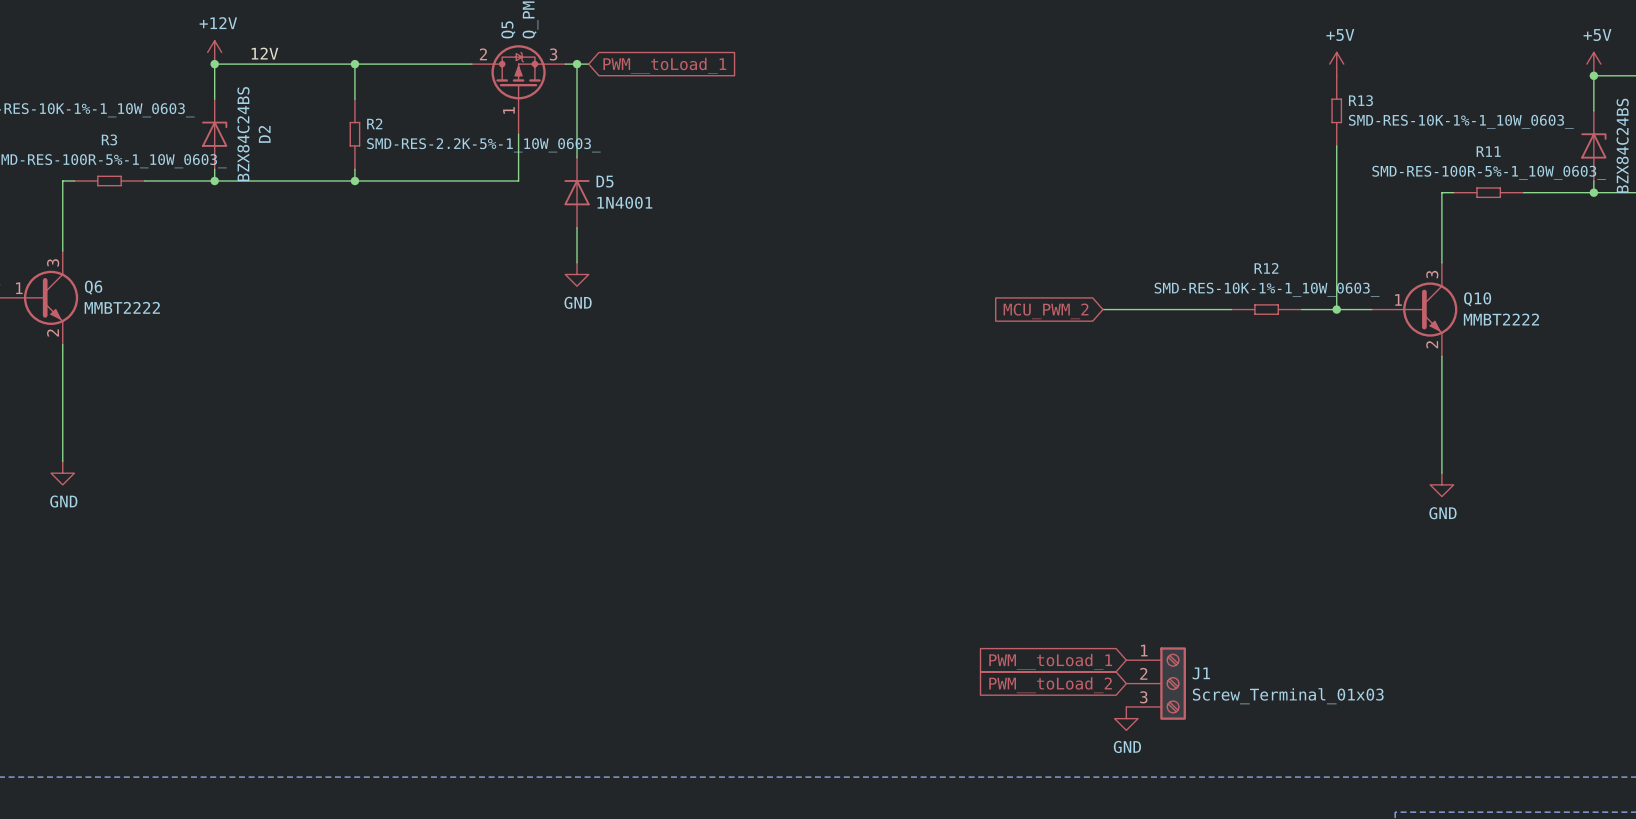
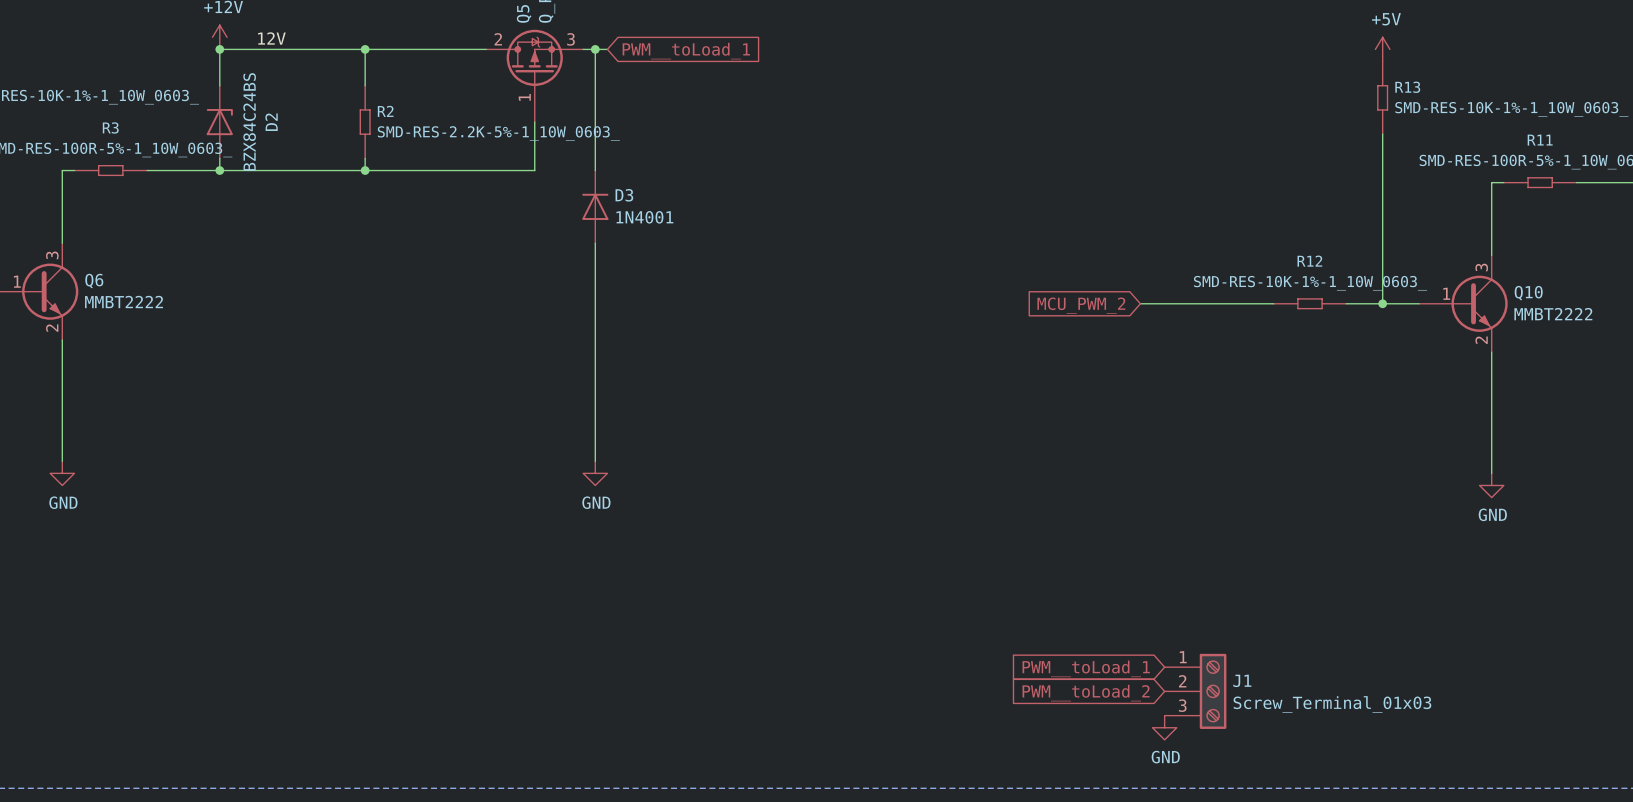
D5: 1N4001 (577, 192) -> none
D3: none -> 1N4001 (595, 206)
wire: none -> (595, 255) (595, 461)
power symbol position: GND (577, 274) -> GND (595, 473)

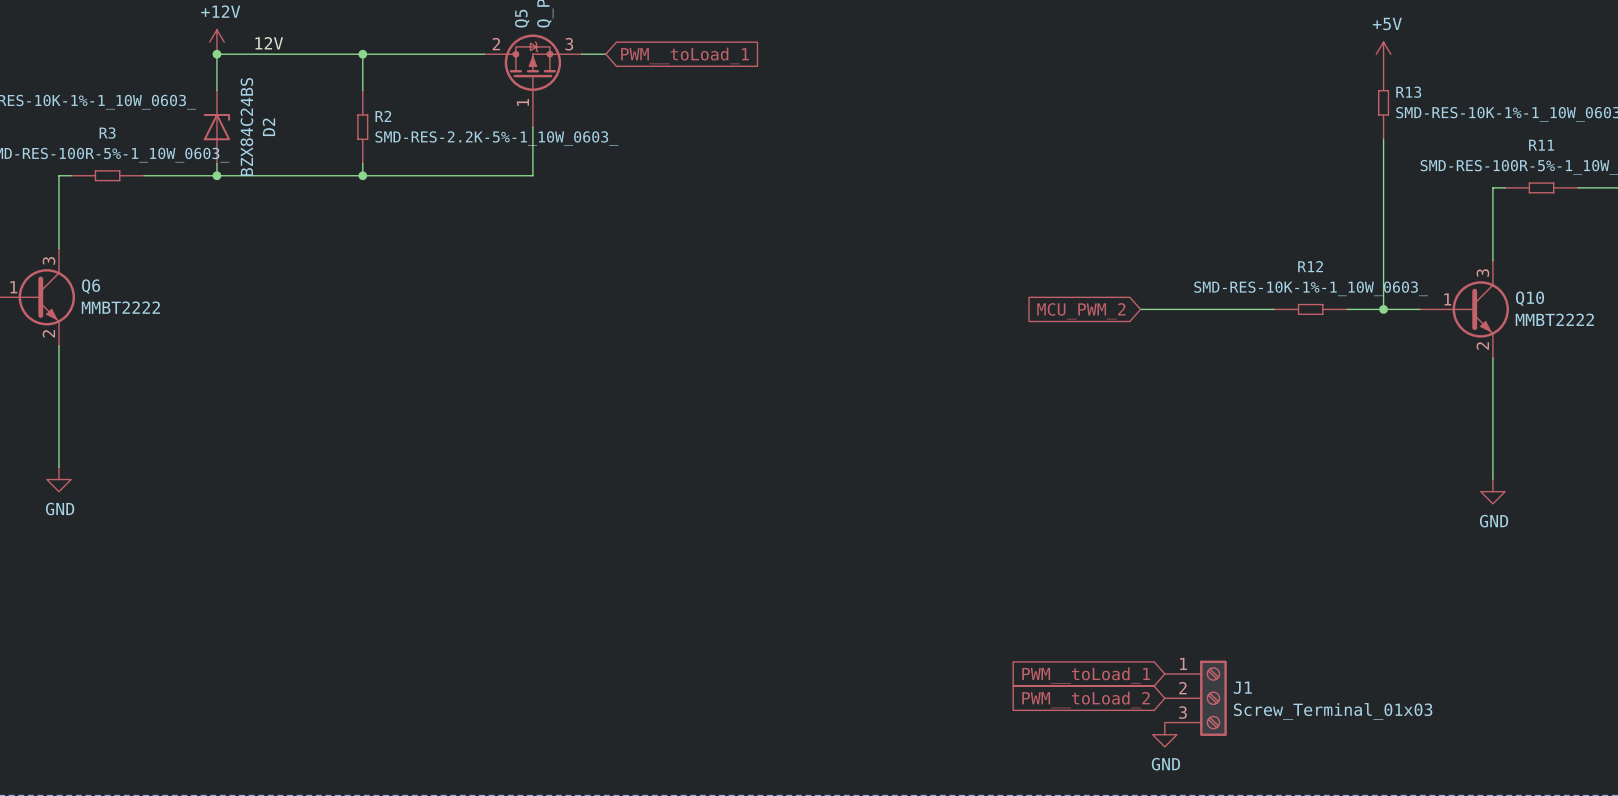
wire: (595, 49) (595, 170) -> none
junction: (595, 49) -> none
D3: 1N4001 (595, 206) -> none
wire: (595, 243) (595, 461) -> none
power symbol: GND (595, 473) -> none

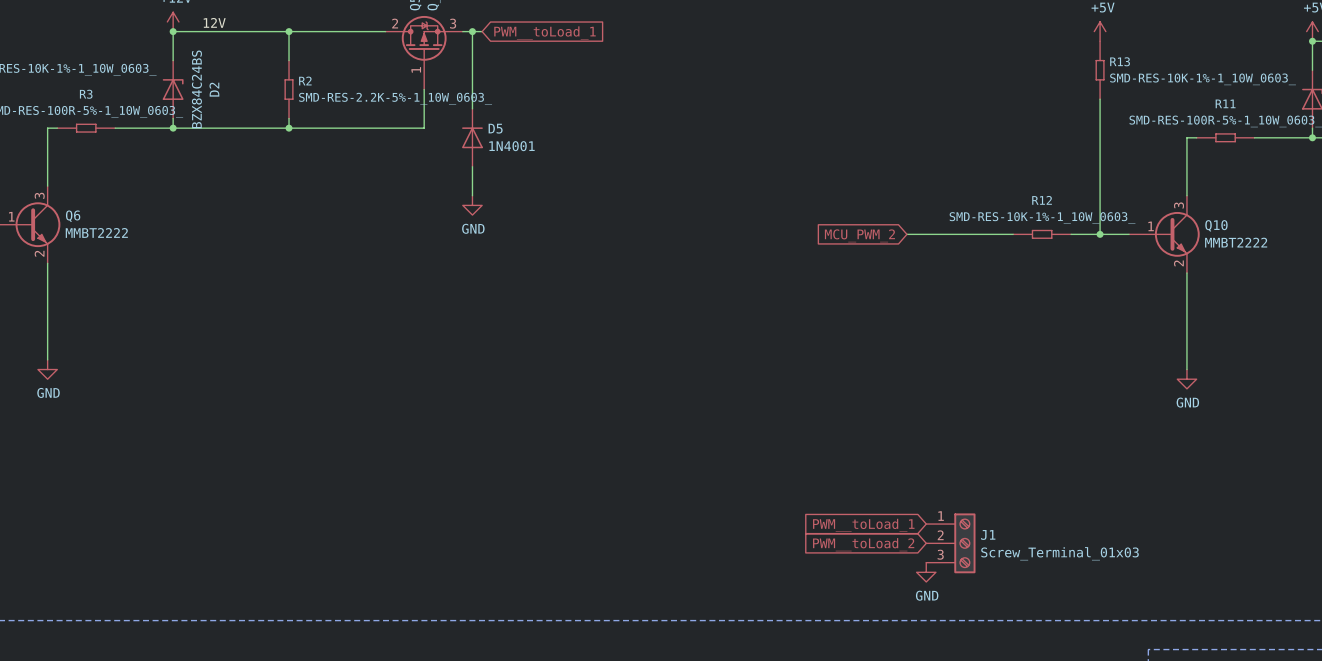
wire: none -> (472, 31) (472, 108)
junction: none -> (472, 31)
D5: none -> 1N4001 (472, 137)
wire: none -> (472, 166) (472, 195)
power symbol: none -> GND (472, 205)

